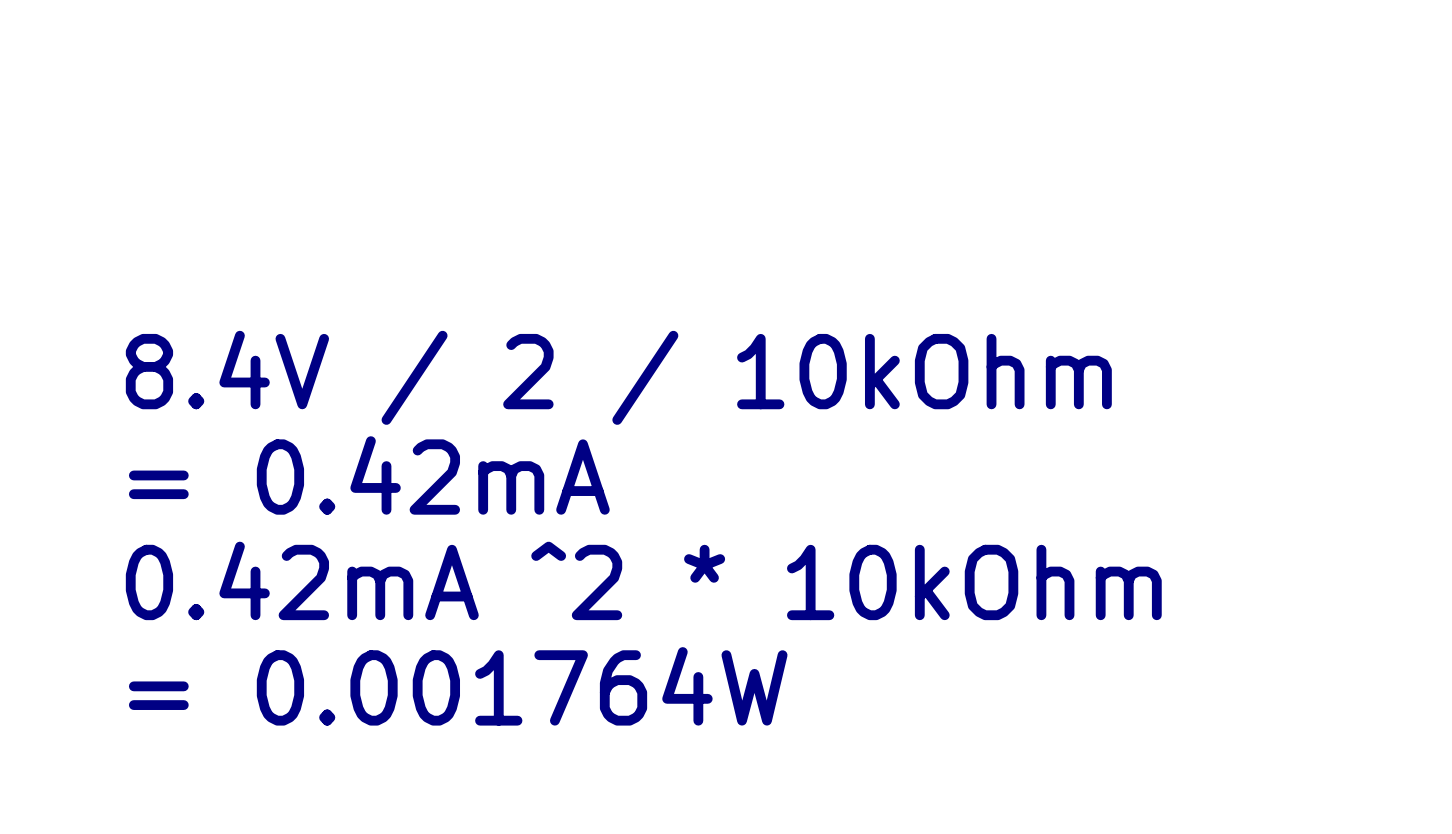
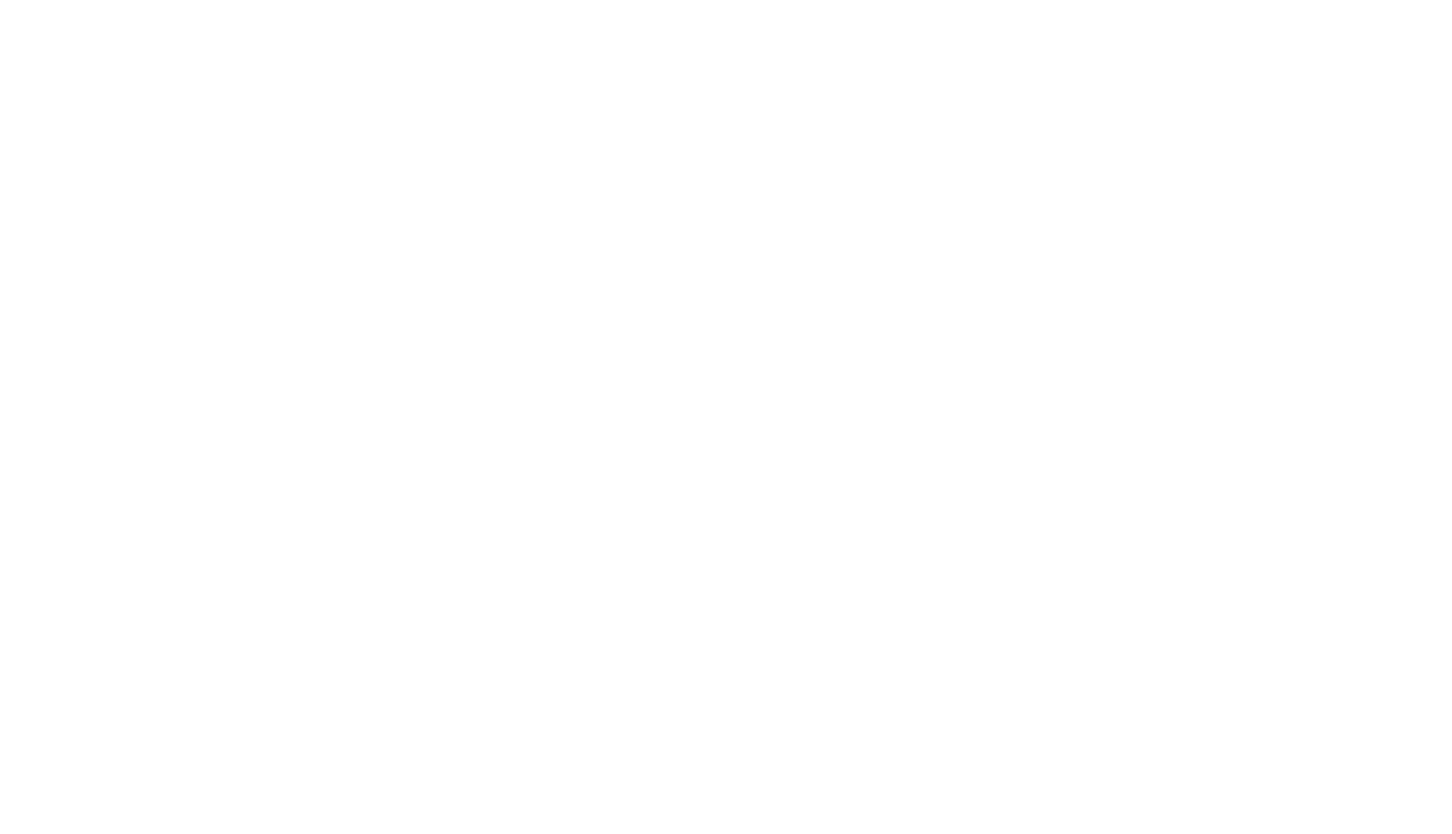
text: 8.4V / 2 / 10kOhm (618, 377) -> none
text: = 0.42mA (369, 475) -> none
text: 0.42mA ^2 * 10kOhm (643, 580) -> none
text: = 0.001764W (458, 686) -> none

